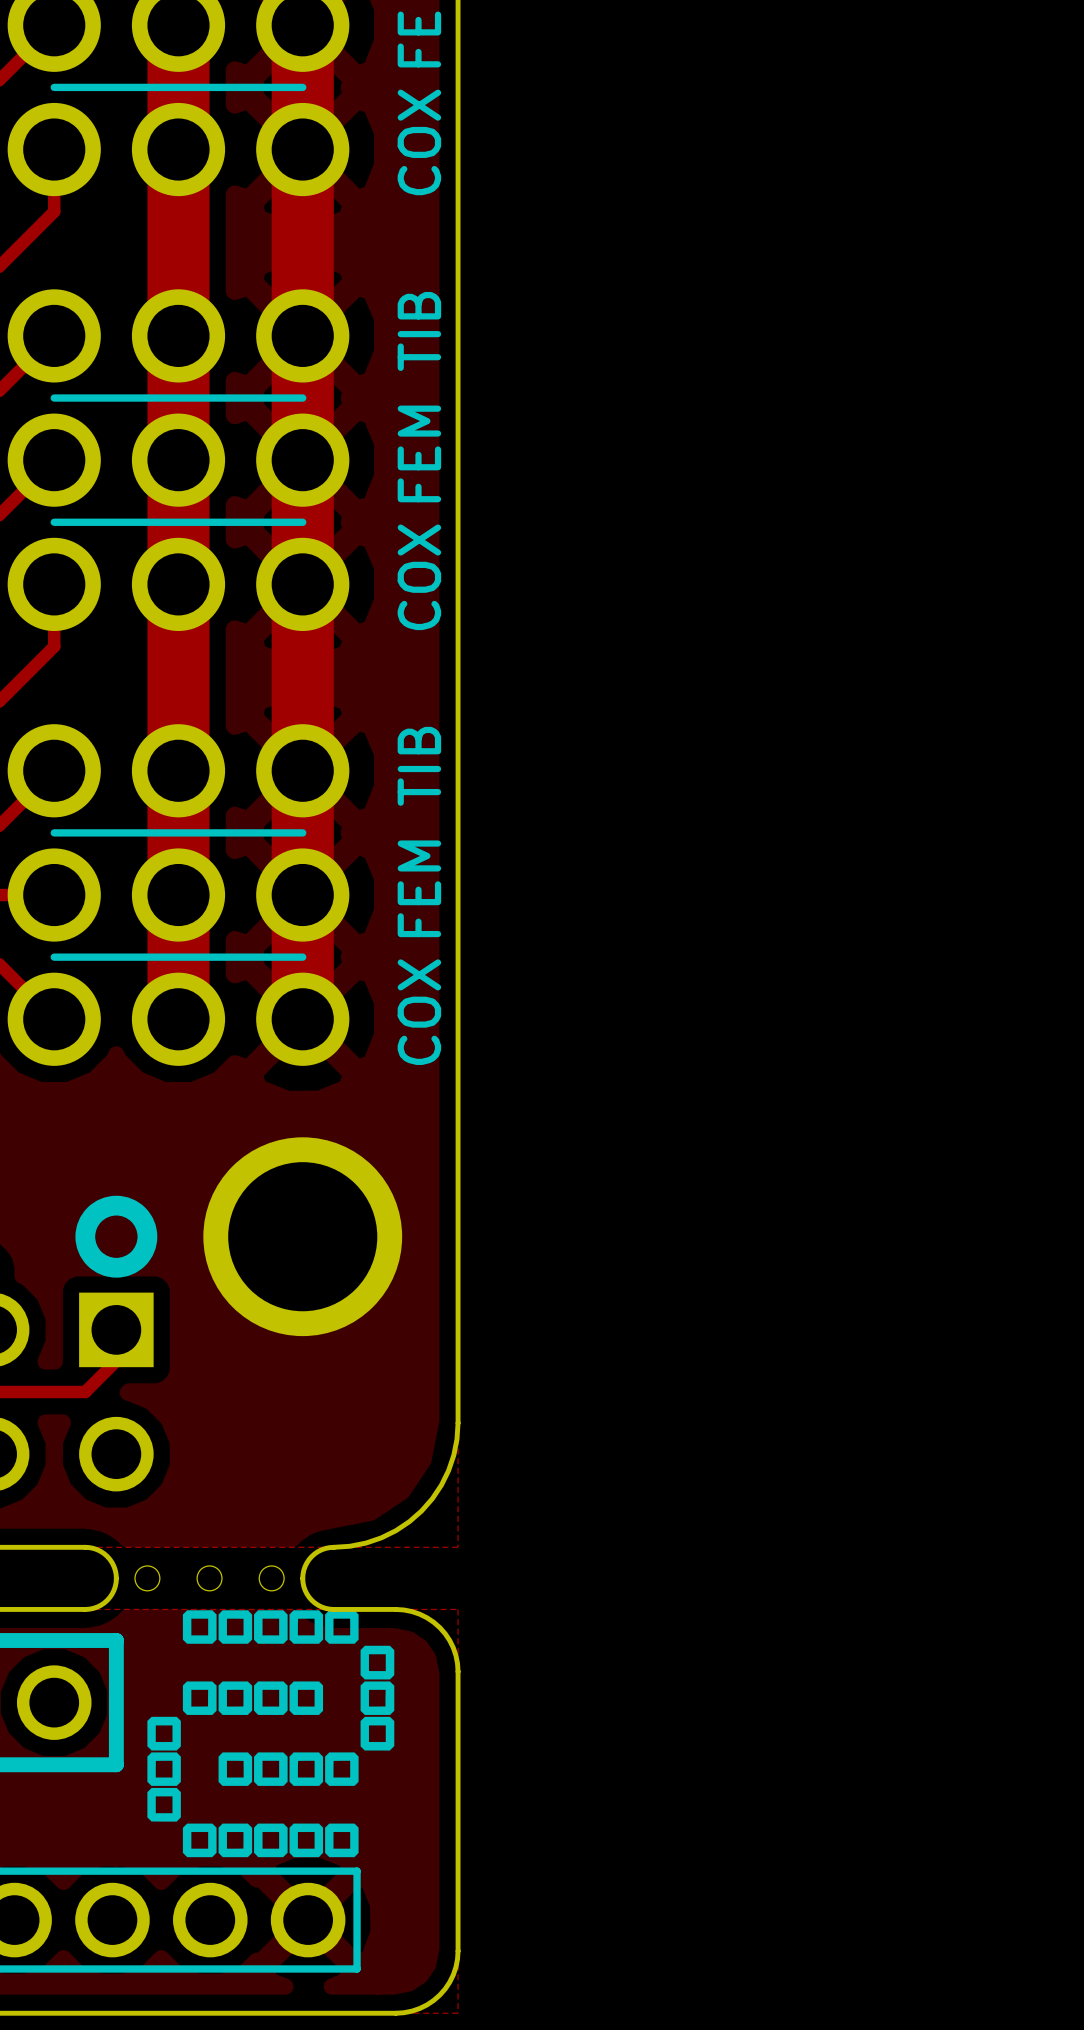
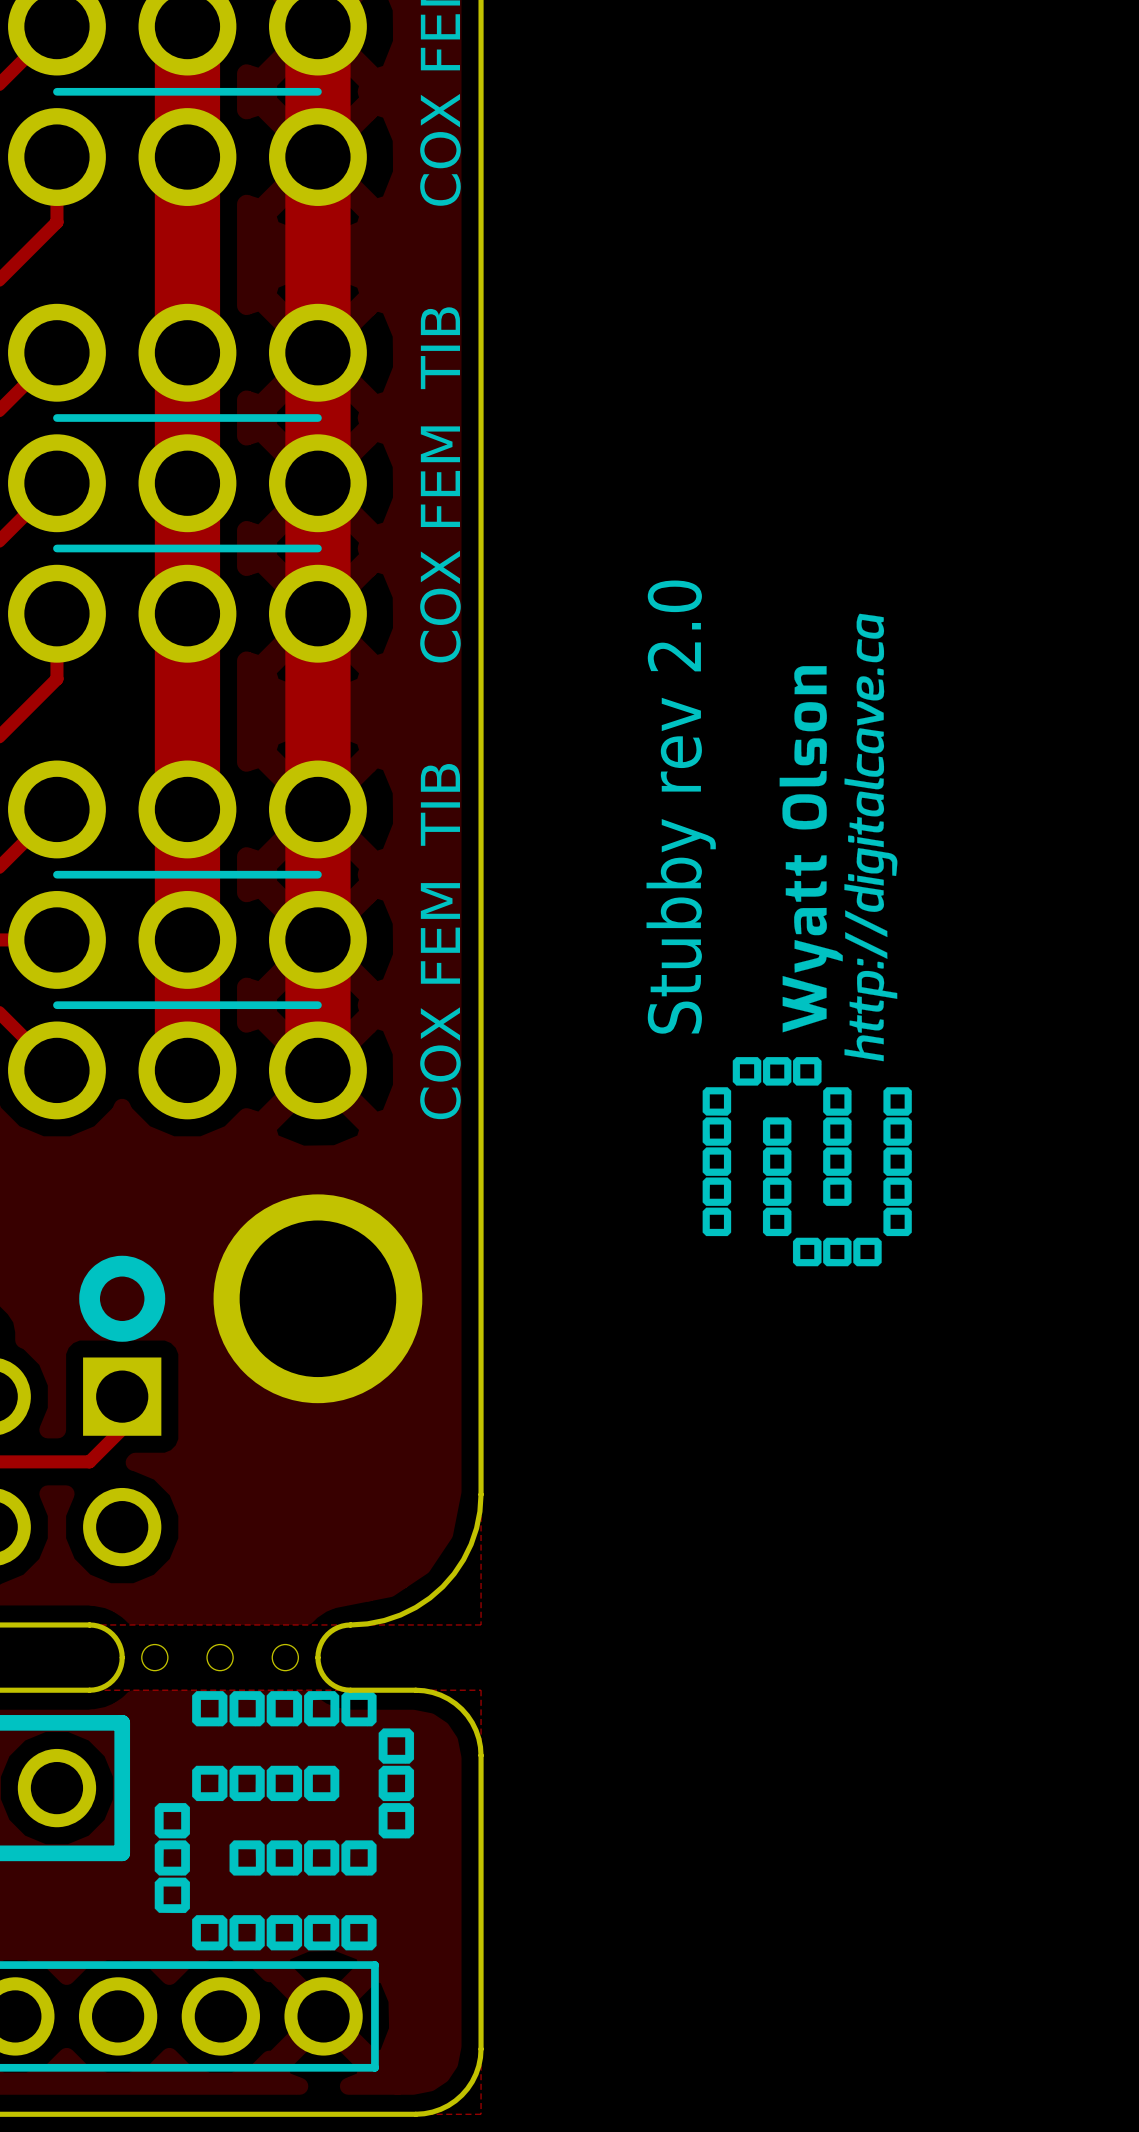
drawing: none -> [702, 613, 912, 1267]
text: none -> Stubby rev 2.0 (681, 807)

